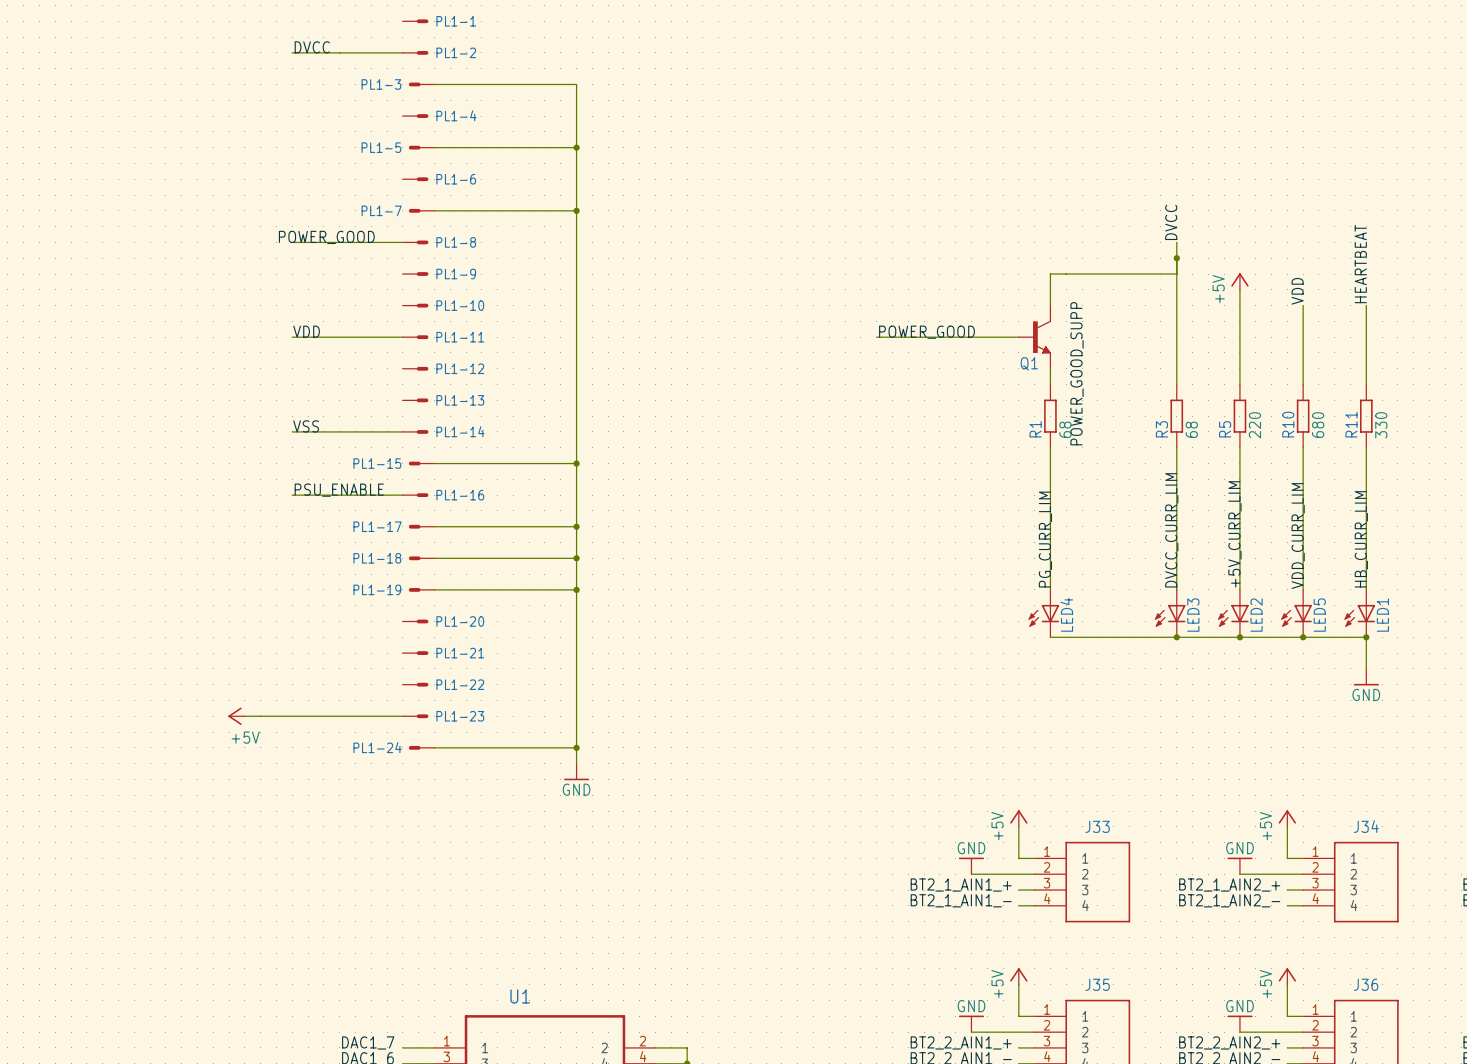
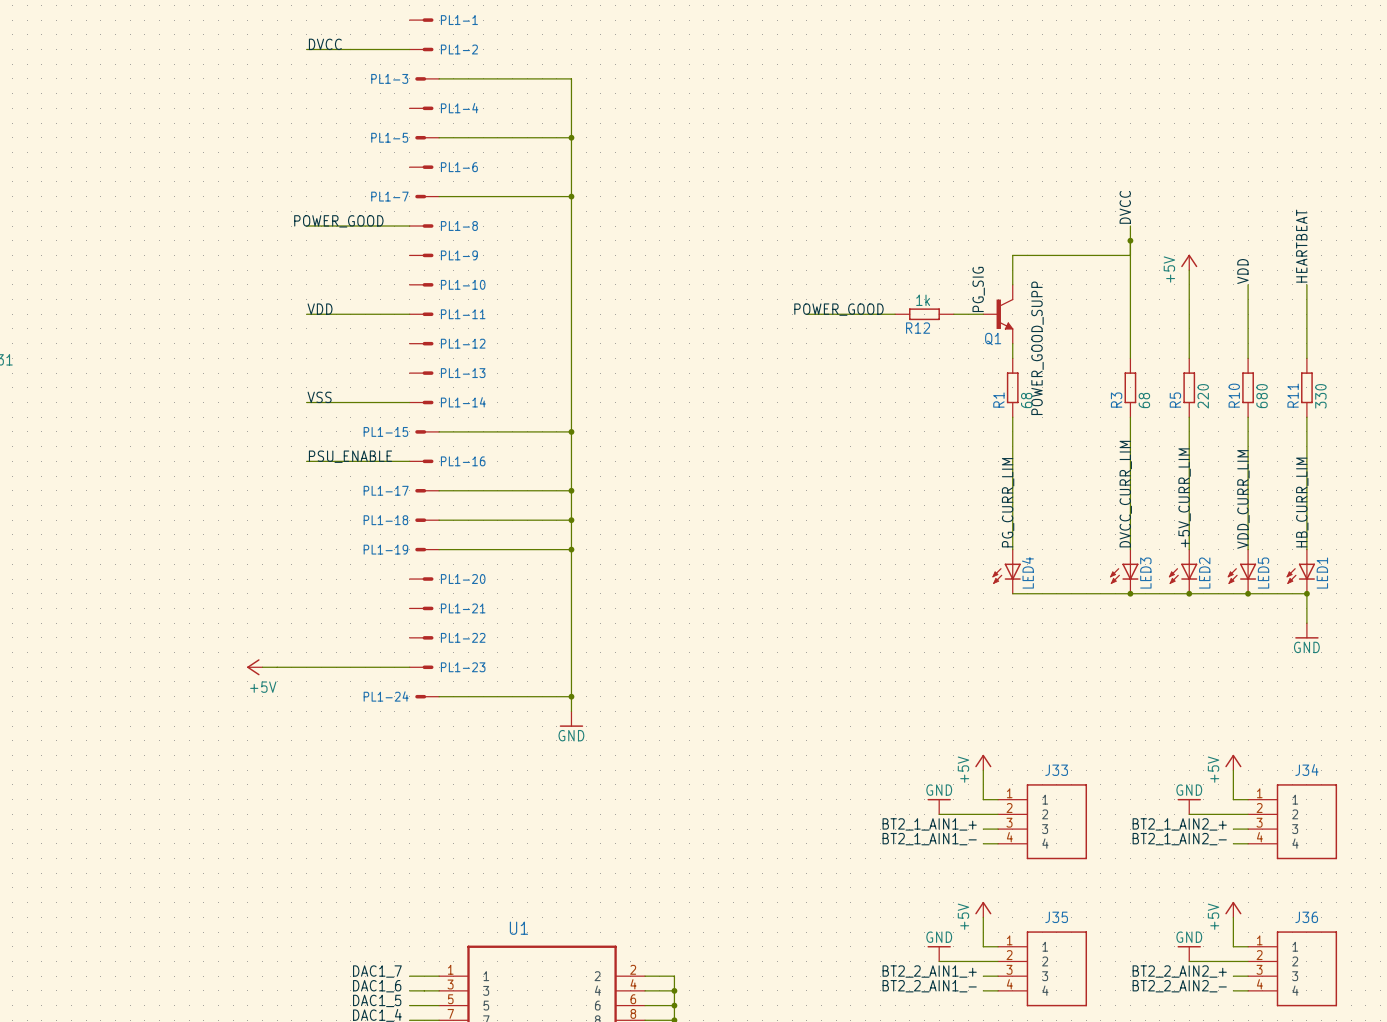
label: none -> PG_SIG (978, 289)
label position: POWER_GOOD (927, 332) -> POWER_GOOD (838, 309)
wire: none -> (806, 314) (850, 314)
R12: none -> 1k (924, 314)

